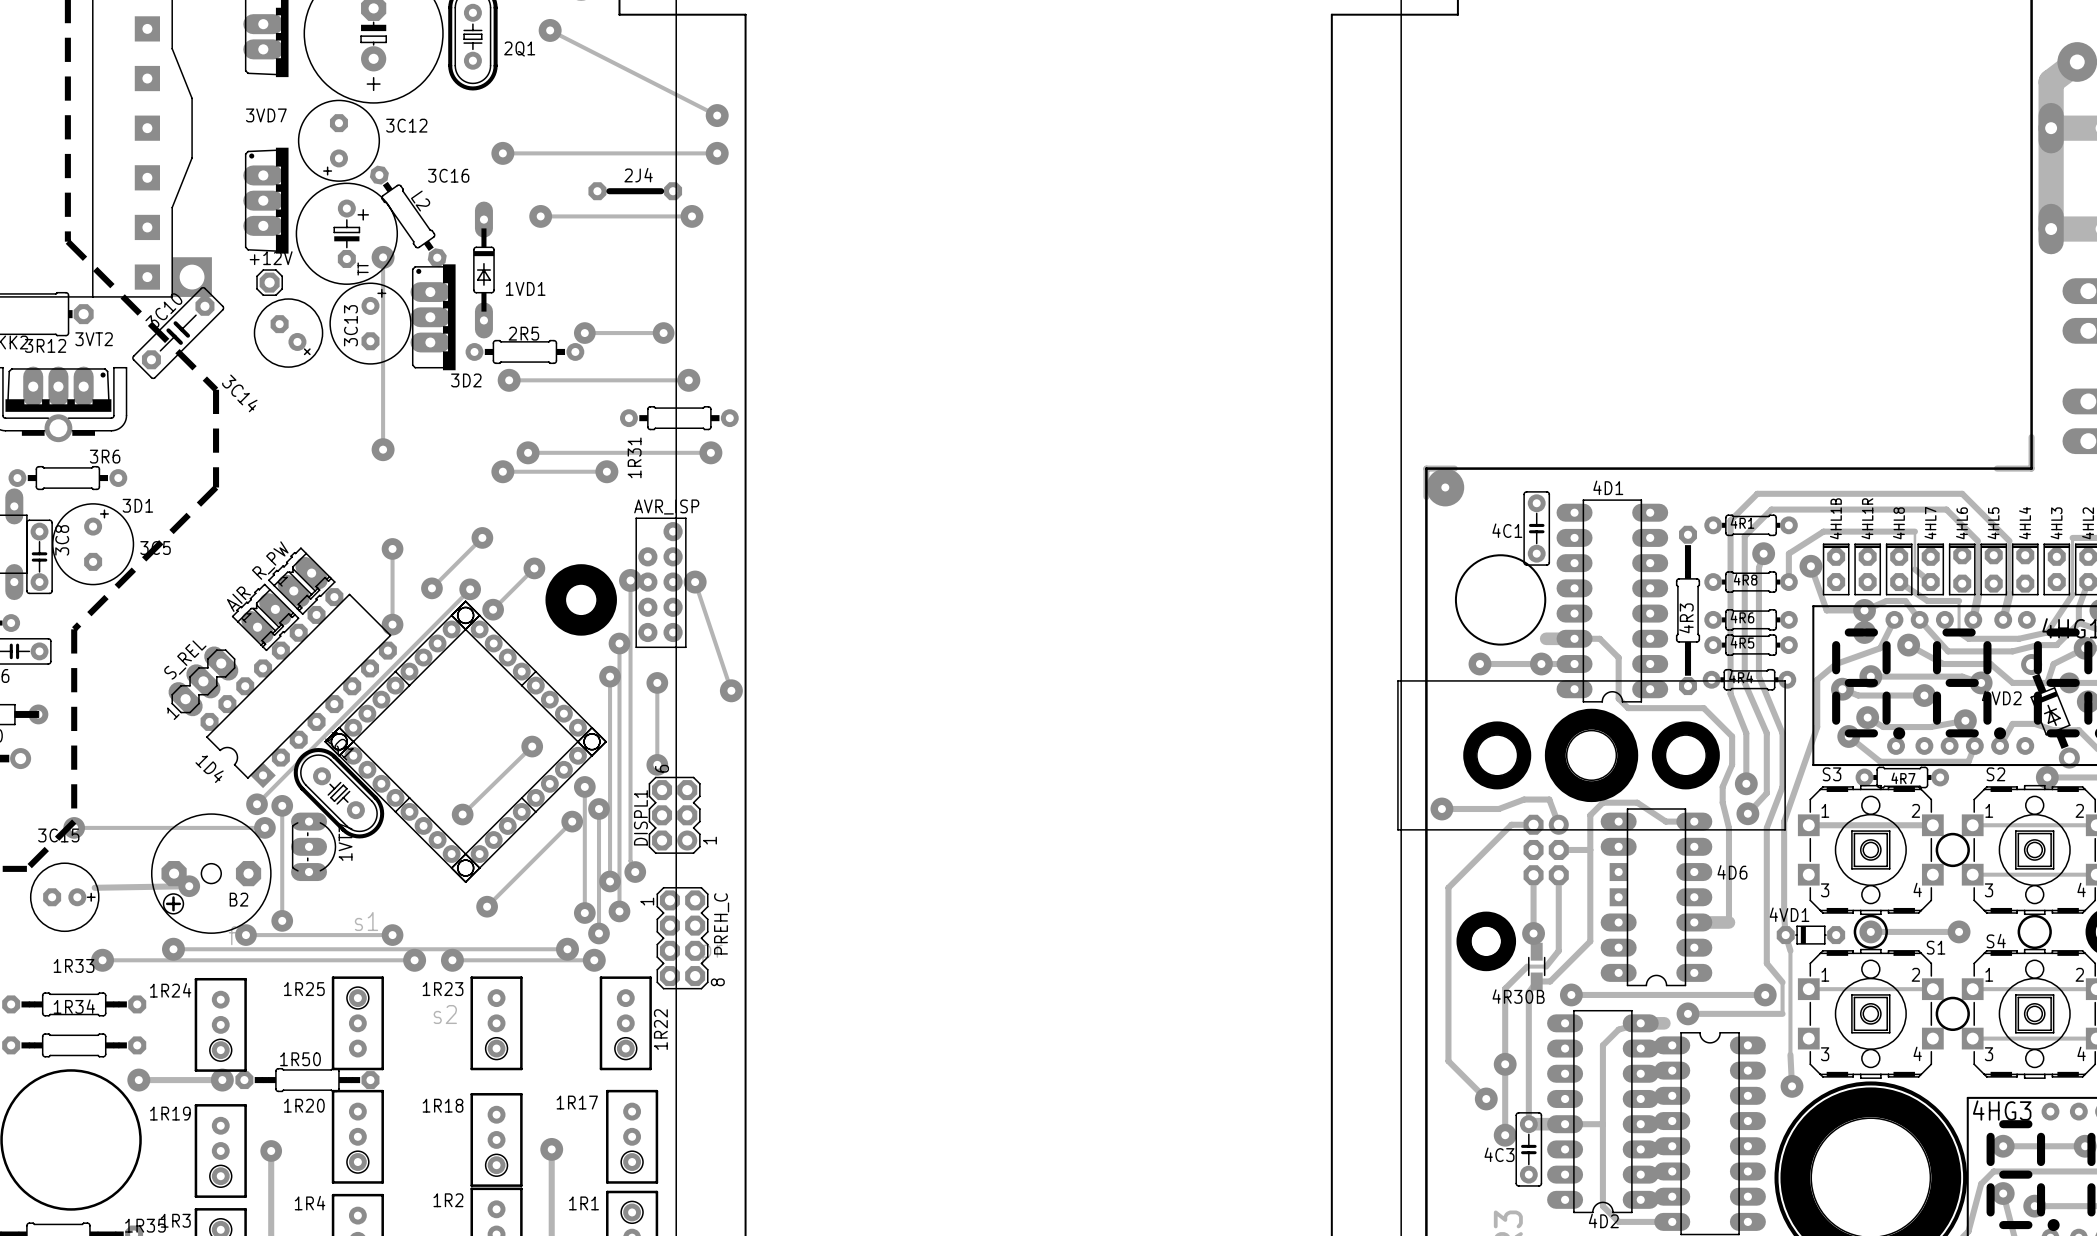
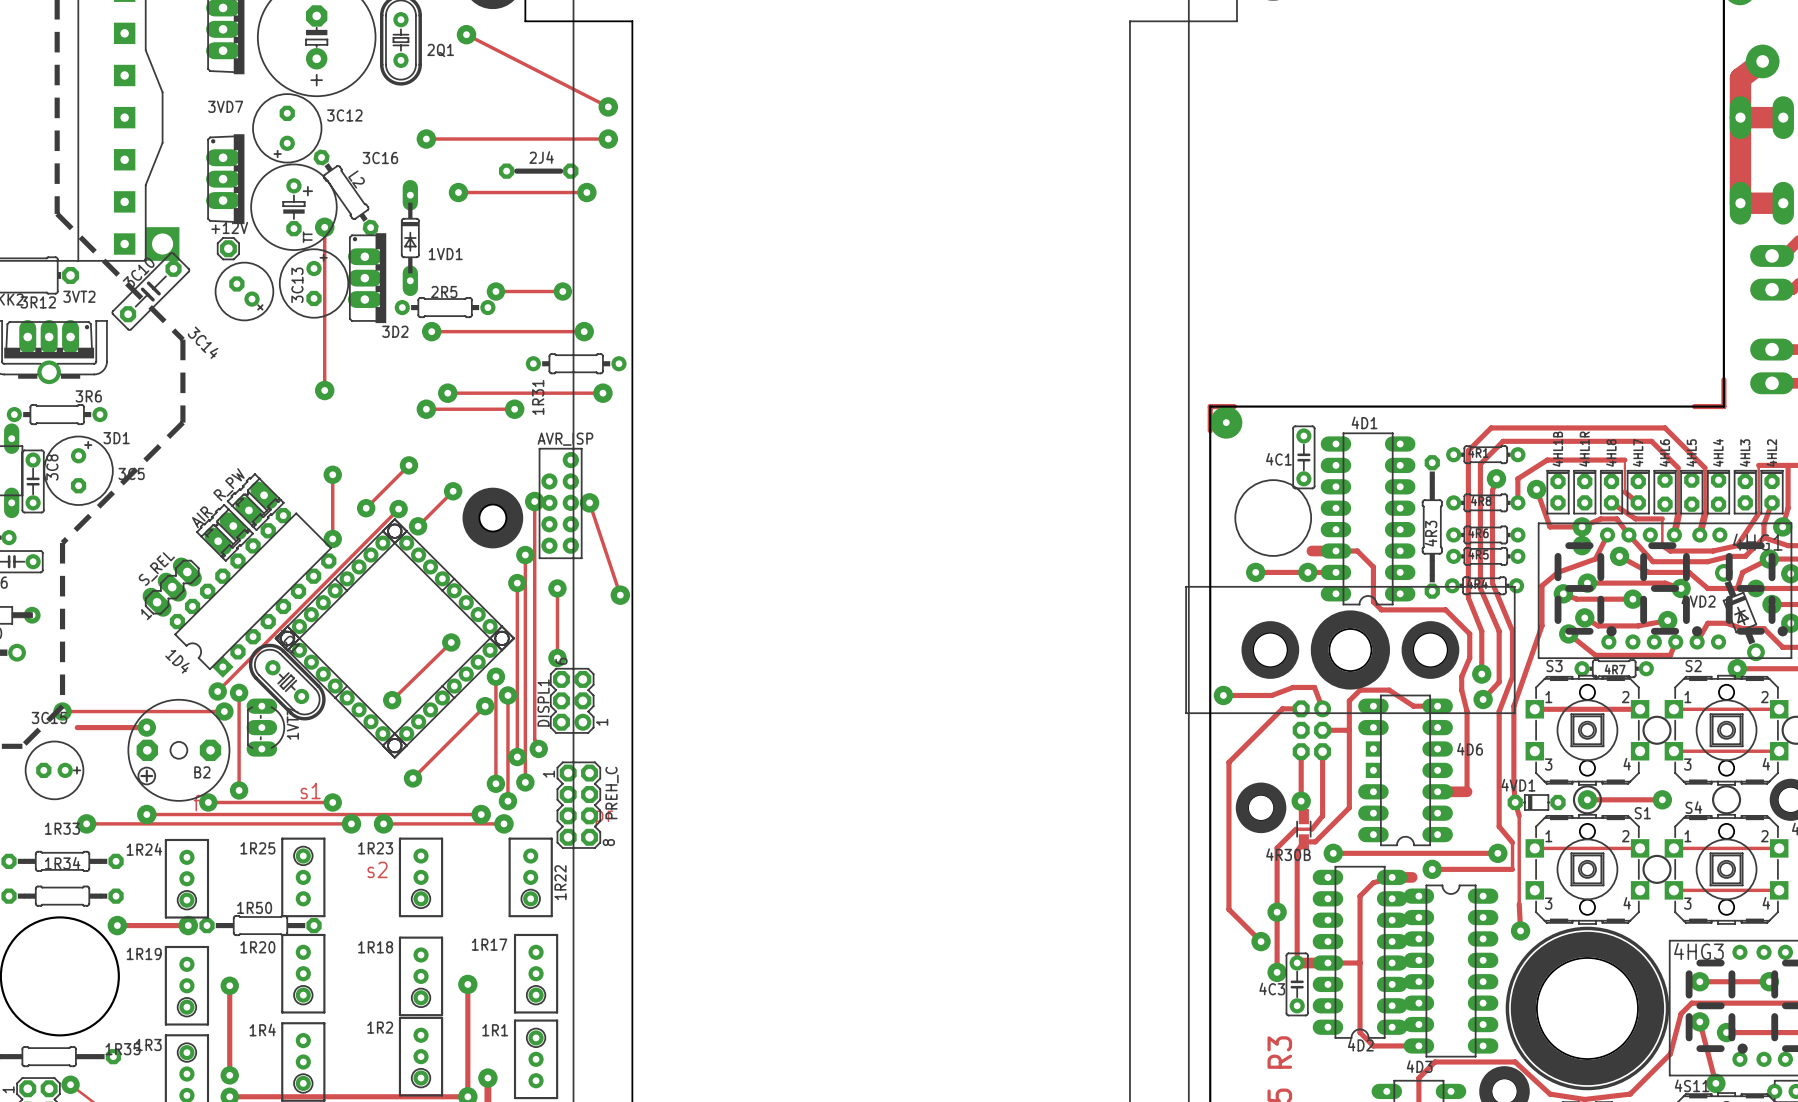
track: none -> (77, 727) (146, 727)
track: (189, 886) (94, 887) -> none
via position: (189, 886) -> (146, 727)

